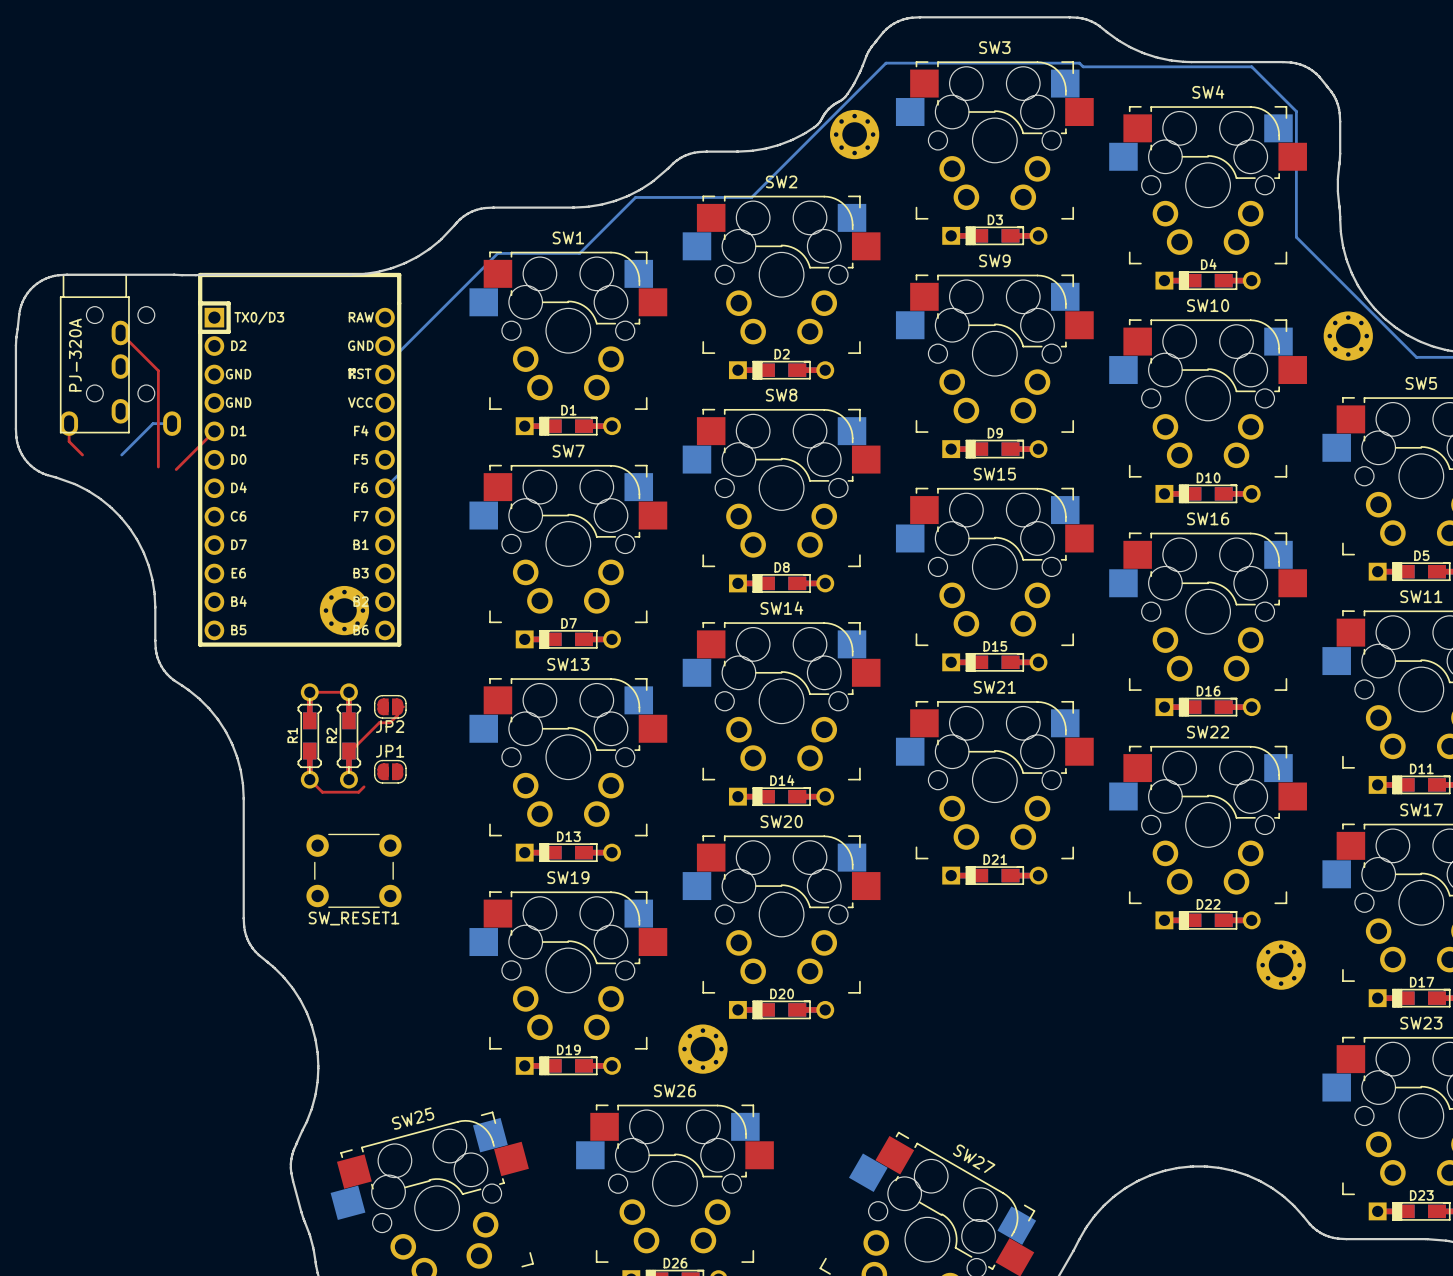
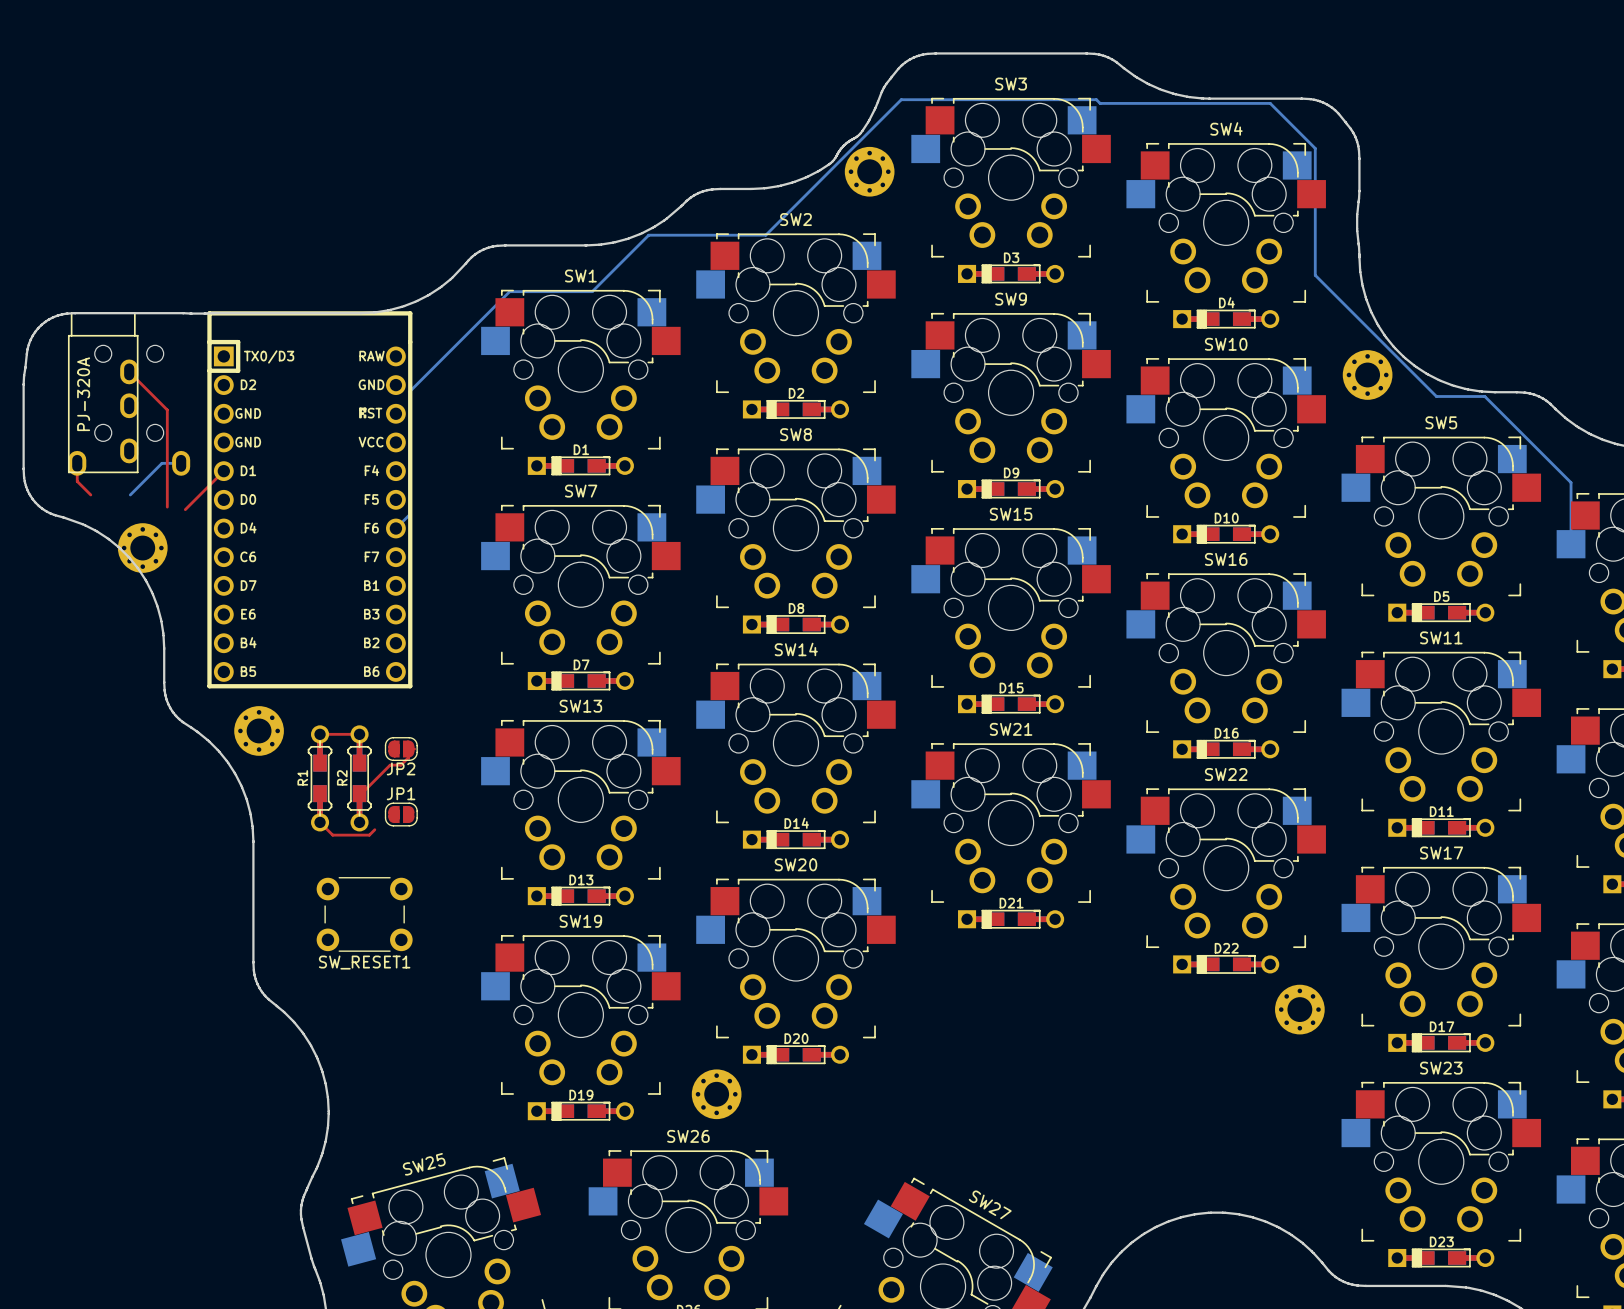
part: none -> (142, 548)
part: (344, 610) -> none
part: none -> (259, 730)

